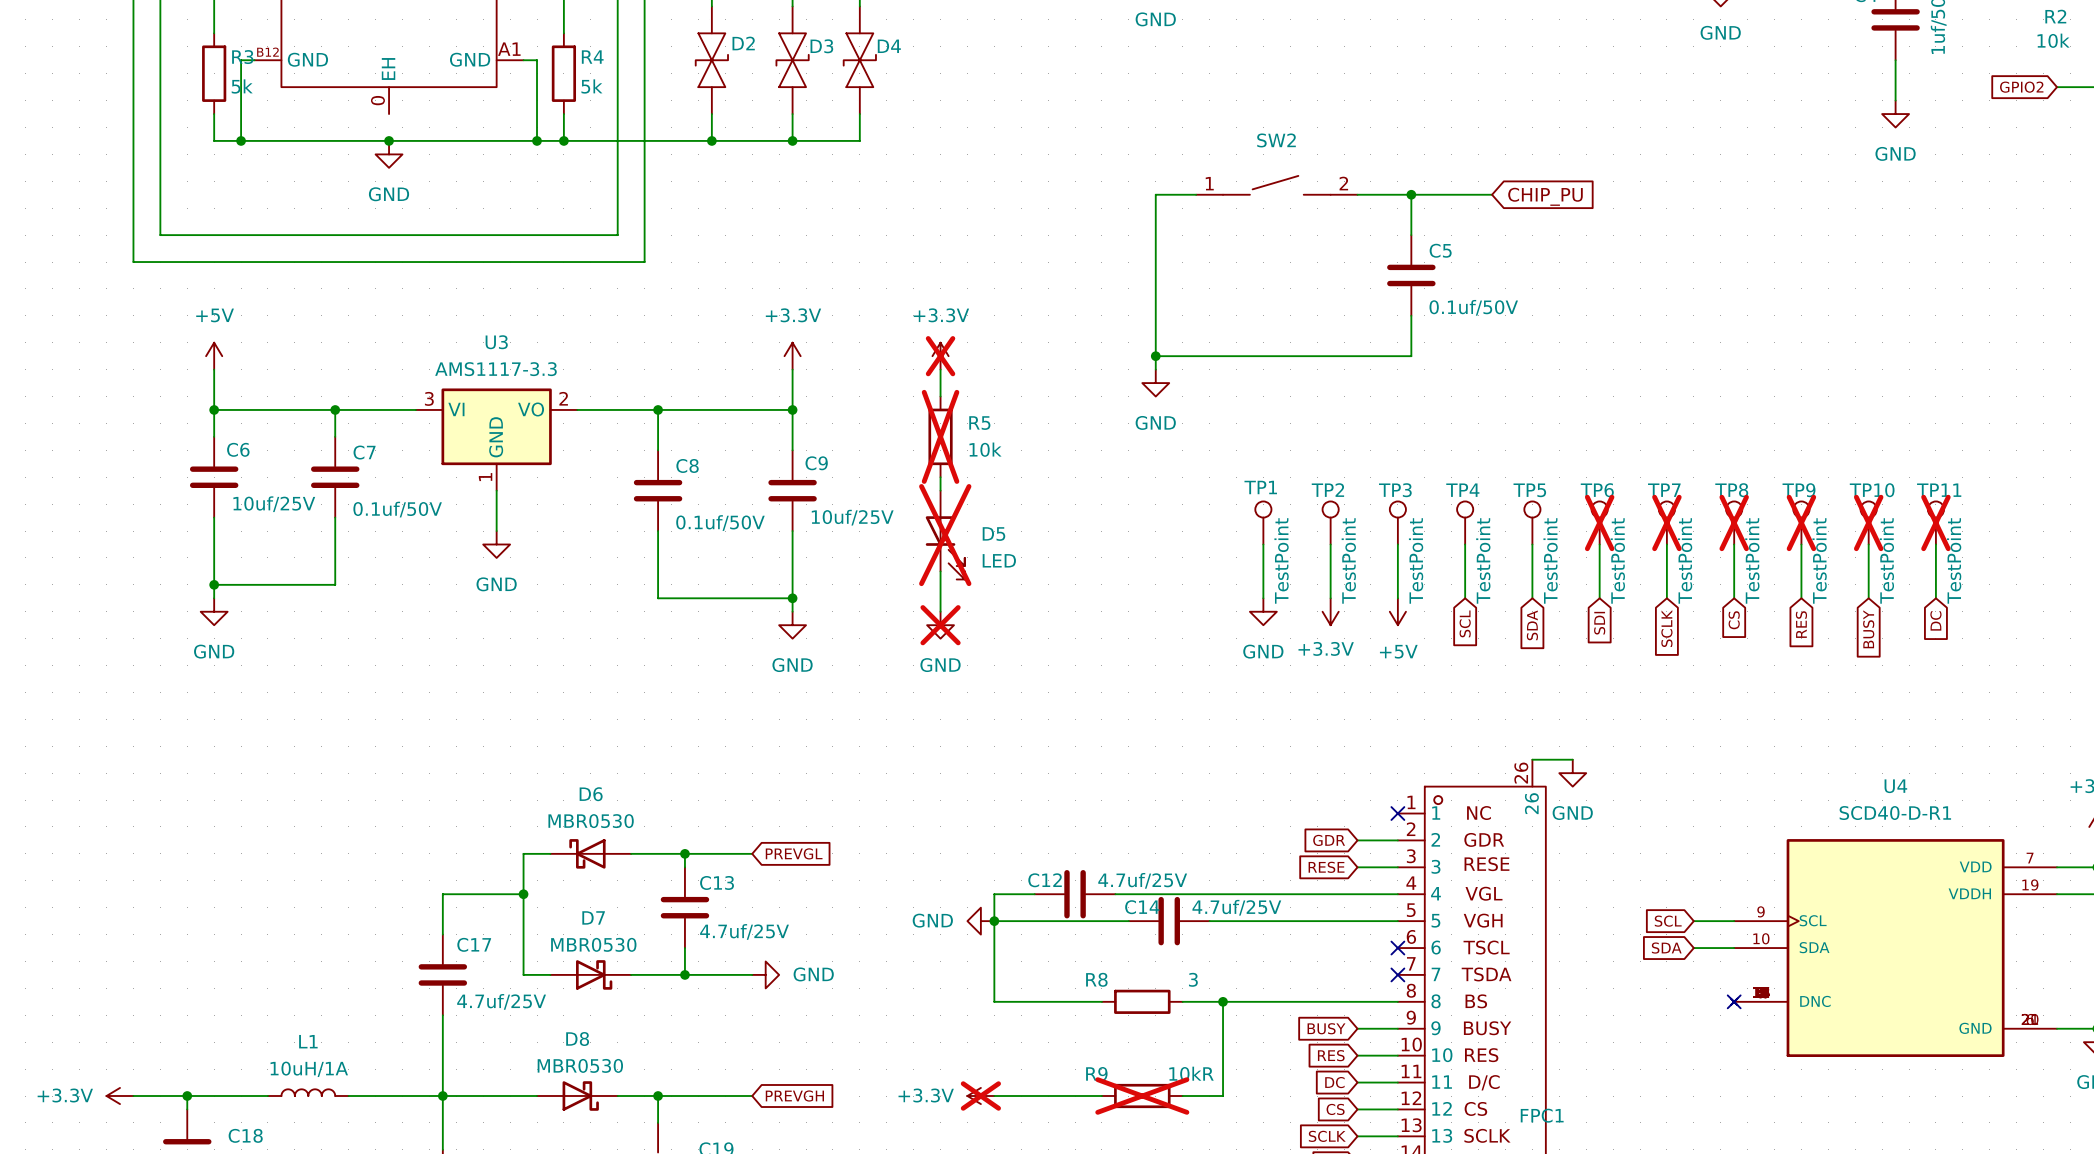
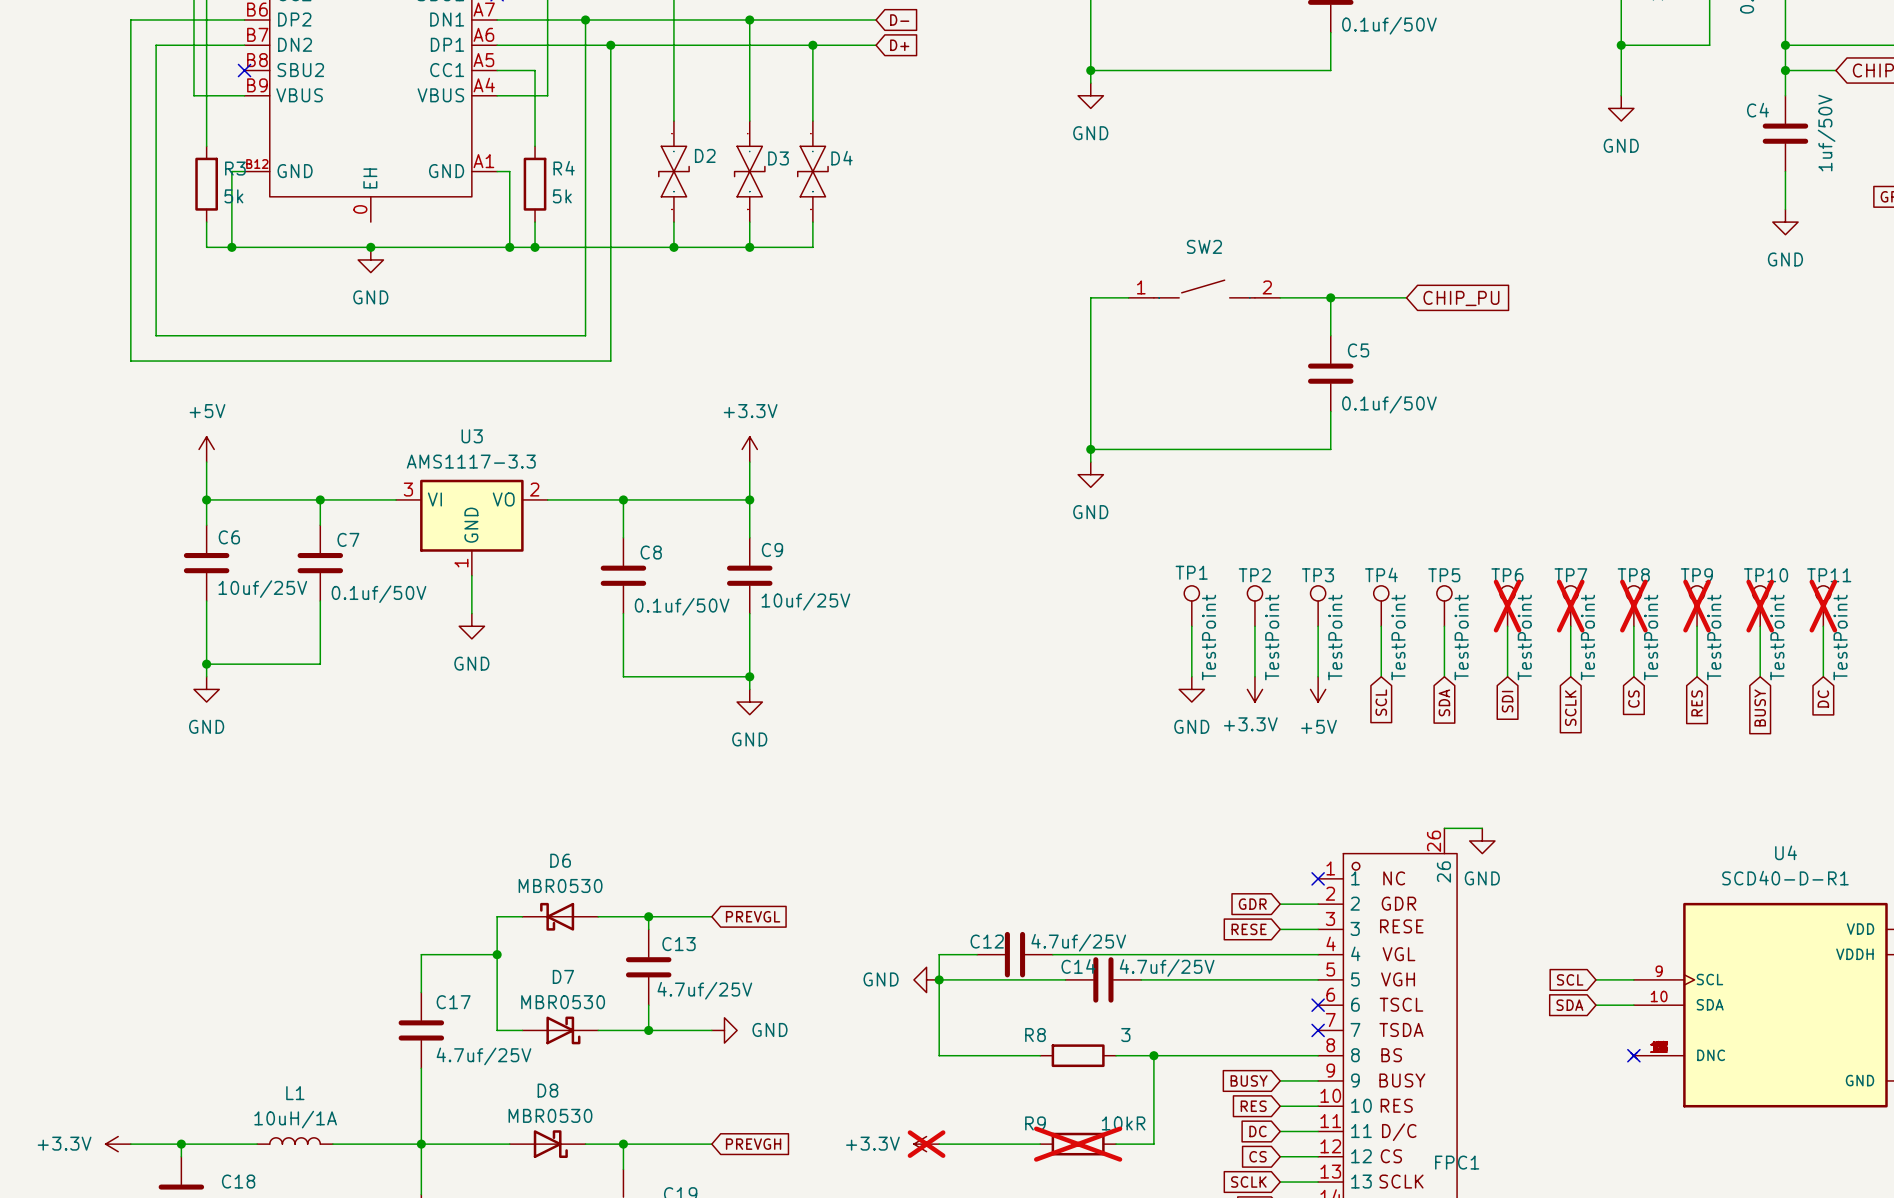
power symbol: +3.3V (940, 356) -> none
wire: (940, 369) (940, 396) -> none
R5: 10k (940, 436) -> none
wire: (940, 477) (940, 490) -> none
D5: LED (945, 535) -> none
wire: (940, 571) (940, 611) -> none
power symbol: GND (940, 625) -> none

